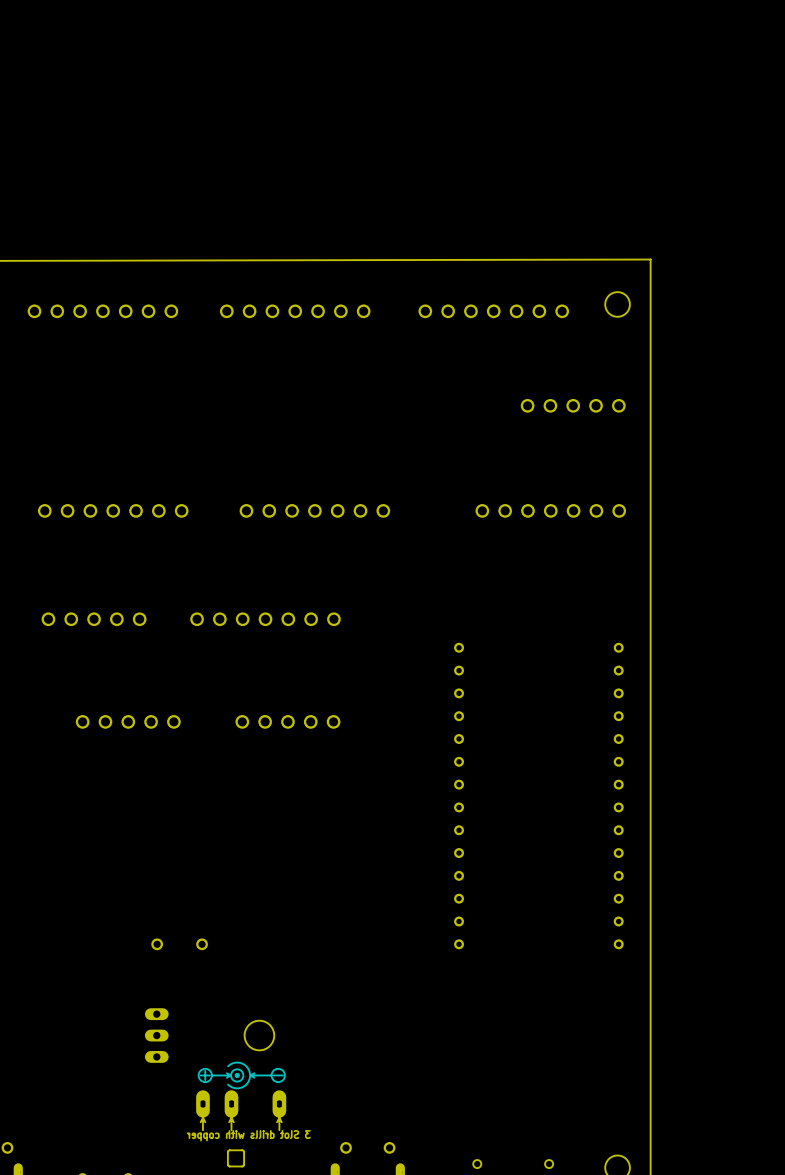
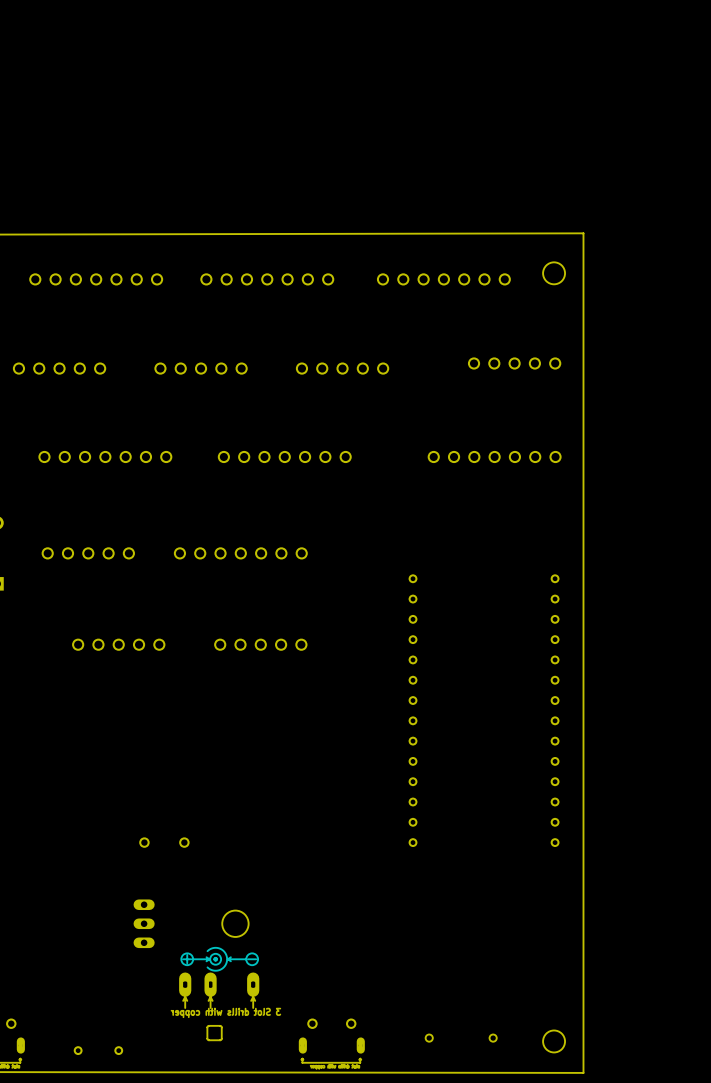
part: none -> (59, 368)
part: none -> (201, 368)
part: none -> (342, 368)

